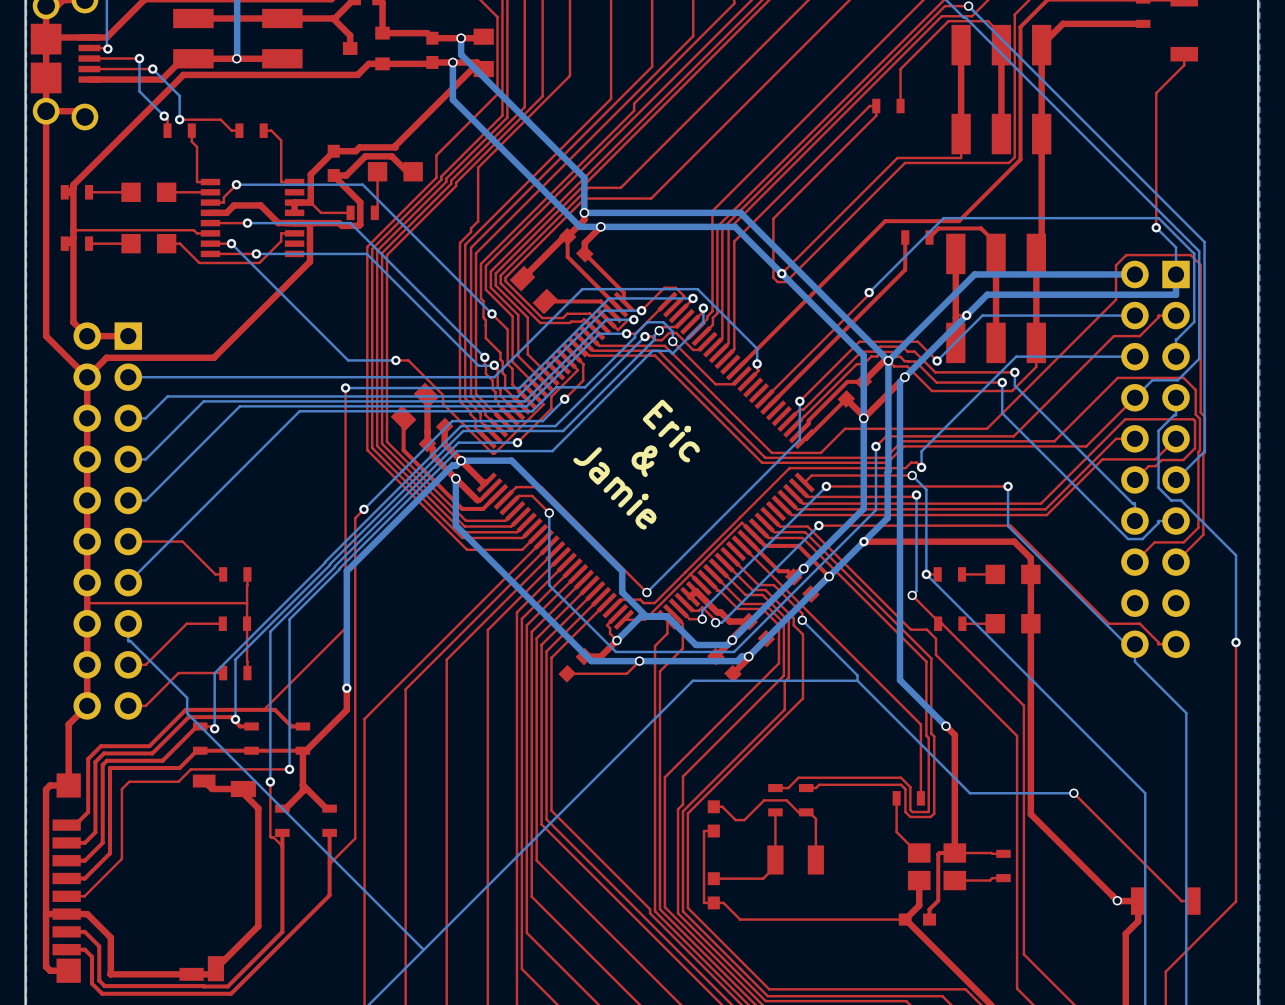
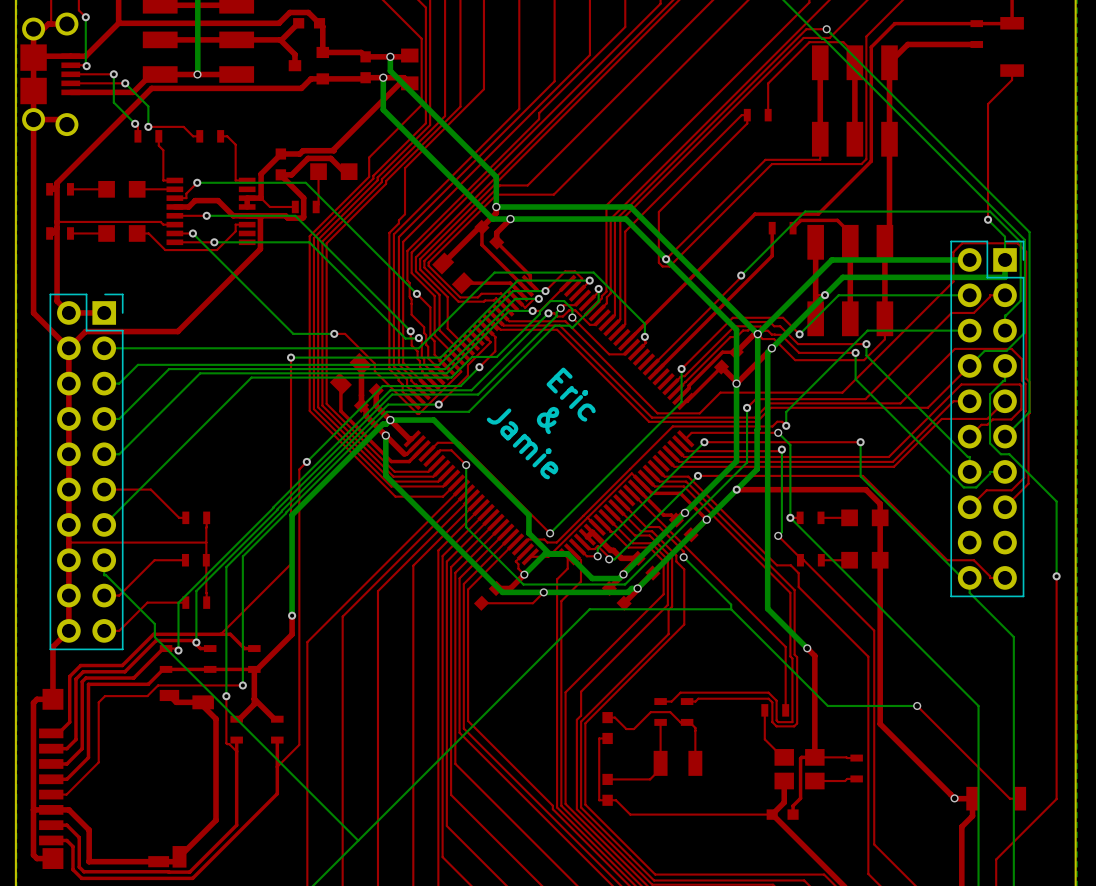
part footprint: [1121, 260, 1190, 659] -> [950, 240, 1025, 598]
part footprint: [73, 322, 143, 720] -> [49, 293, 124, 651]

